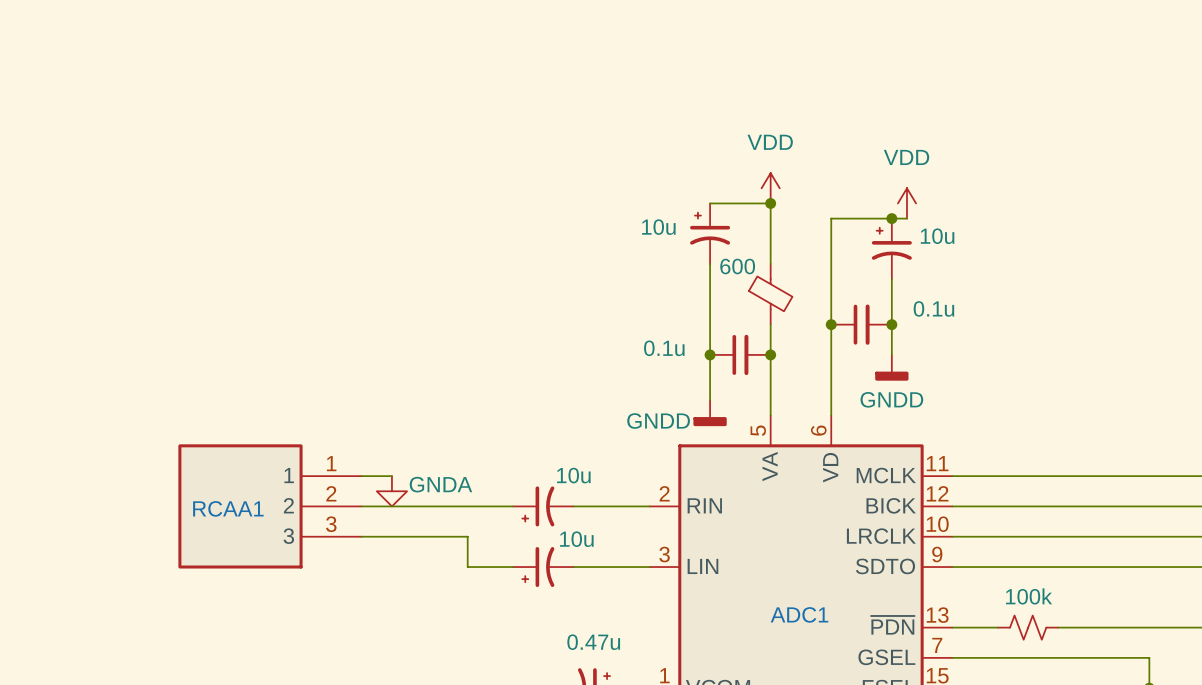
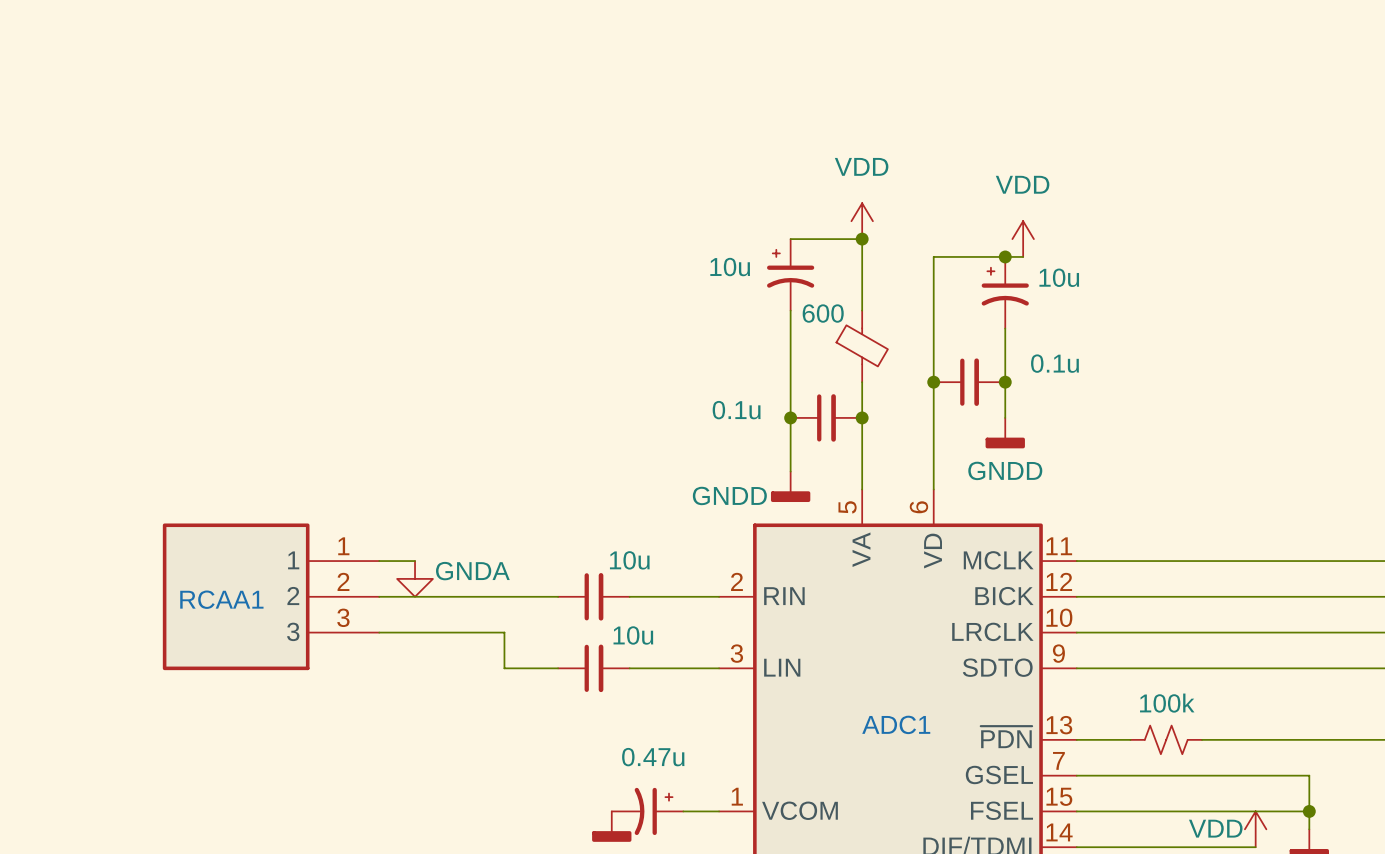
part symbol: [513, 486, 574, 527] -> [558, 573, 630, 621]
part symbol: [513, 547, 574, 588] -> [558, 644, 630, 693]

